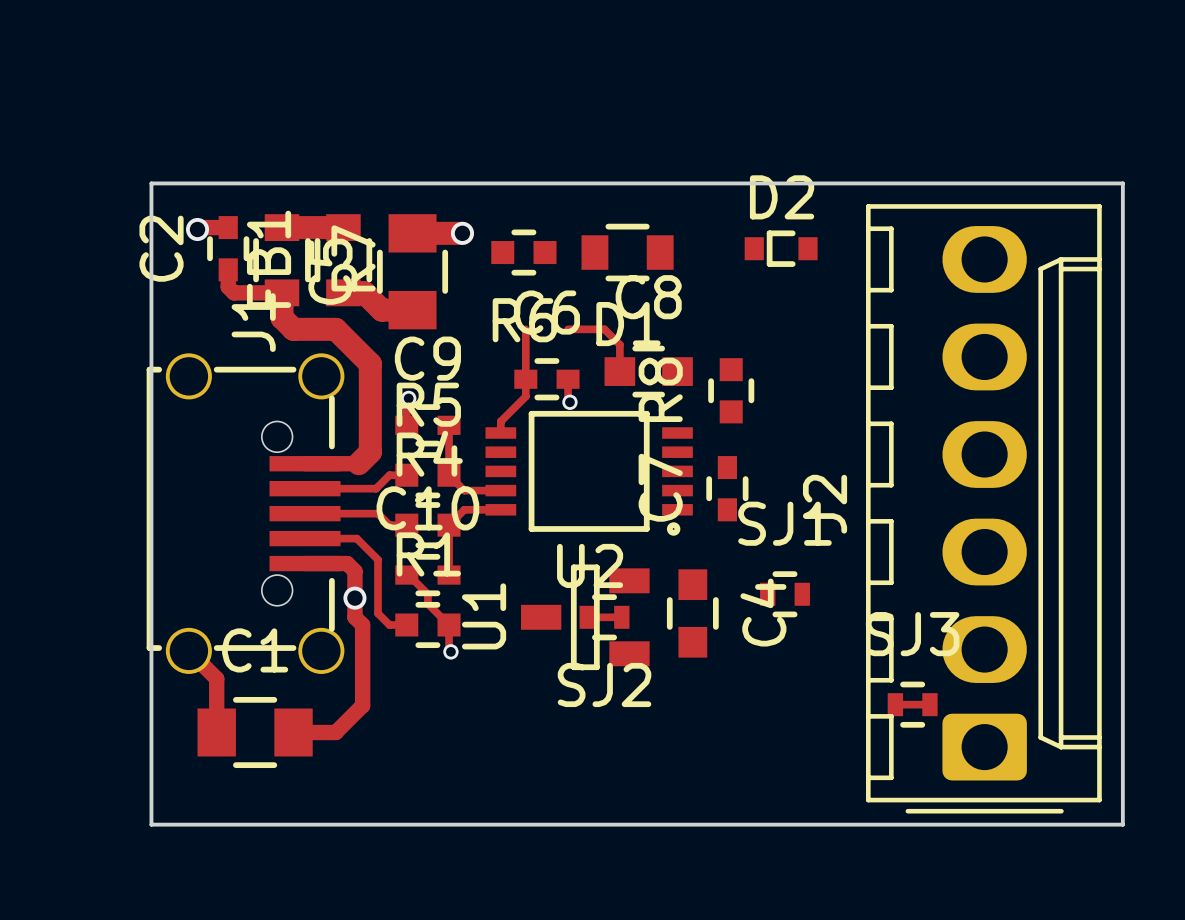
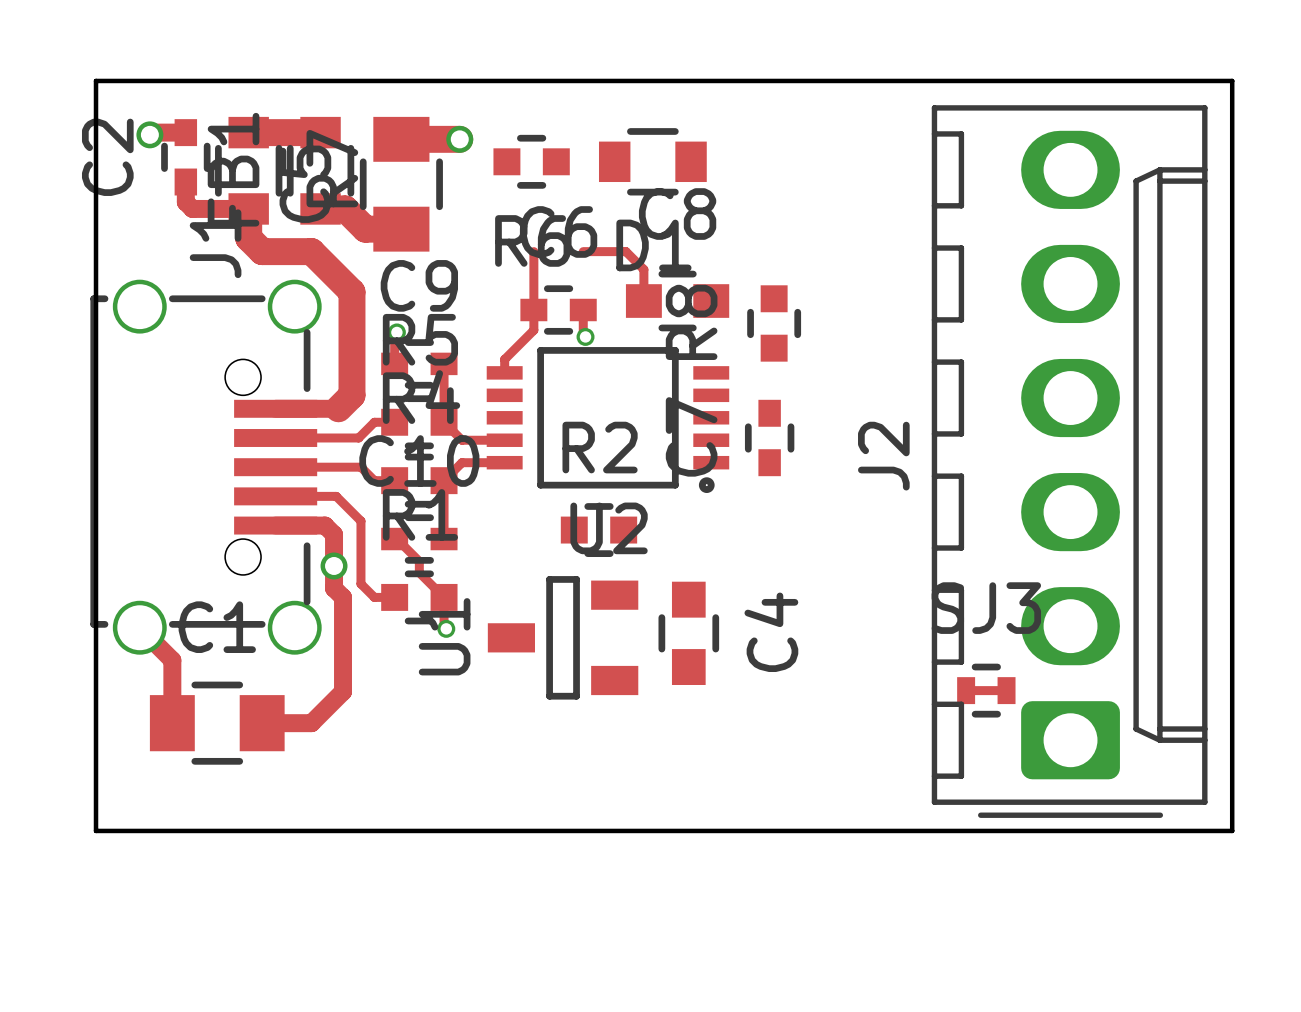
D2: (781, 248) -> none
R2: none -> (598, 530)
SJ1: (784, 594) -> none
C4 position: (692, 613) -> (688, 633)
U1 position: (585, 617) -> (563, 637)
SJ2: (604, 617) -> none

